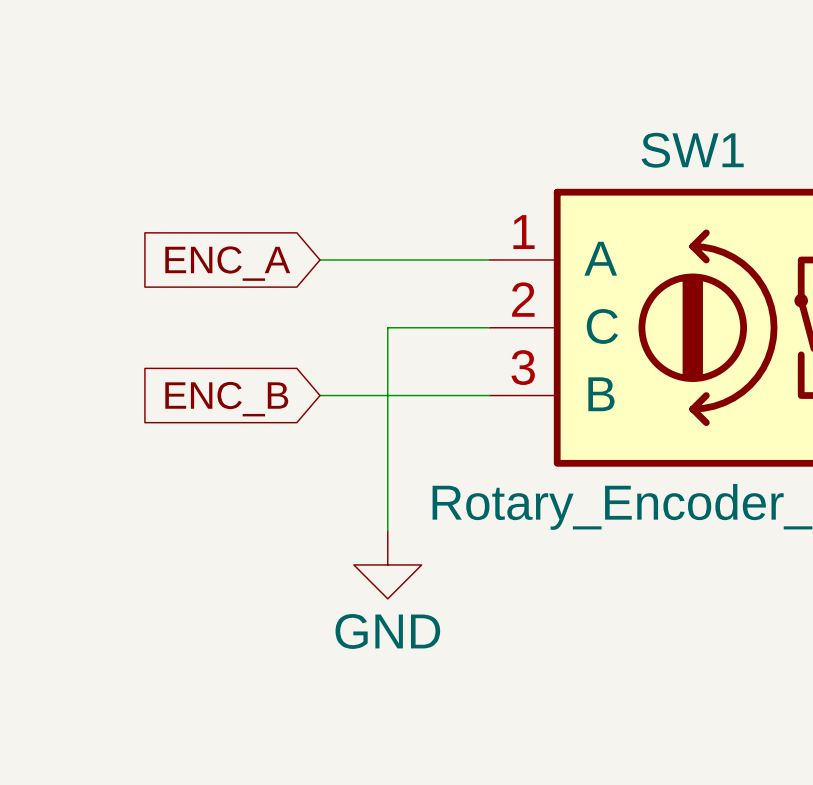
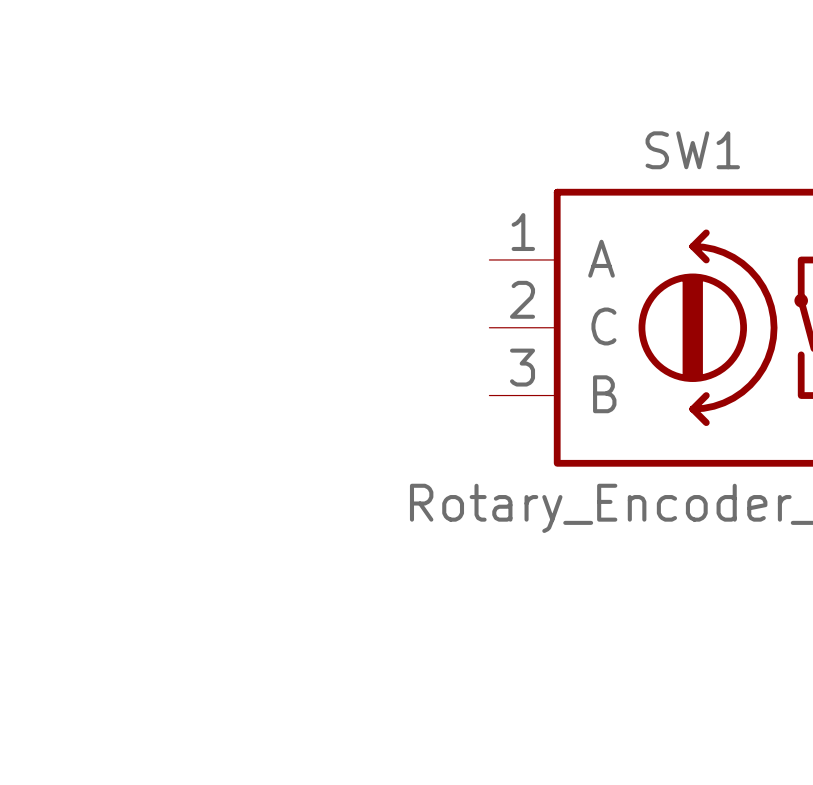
wire: (320, 259) (489, 259) -> none
global label: ENC_A (227, 263) -> none
wire: (489, 327) (387, 327) (387, 531) -> none
wire: (320, 395) (489, 395) -> none
global label: ENC_B (226, 399) -> none
power symbol: GND (387, 564) -> none

